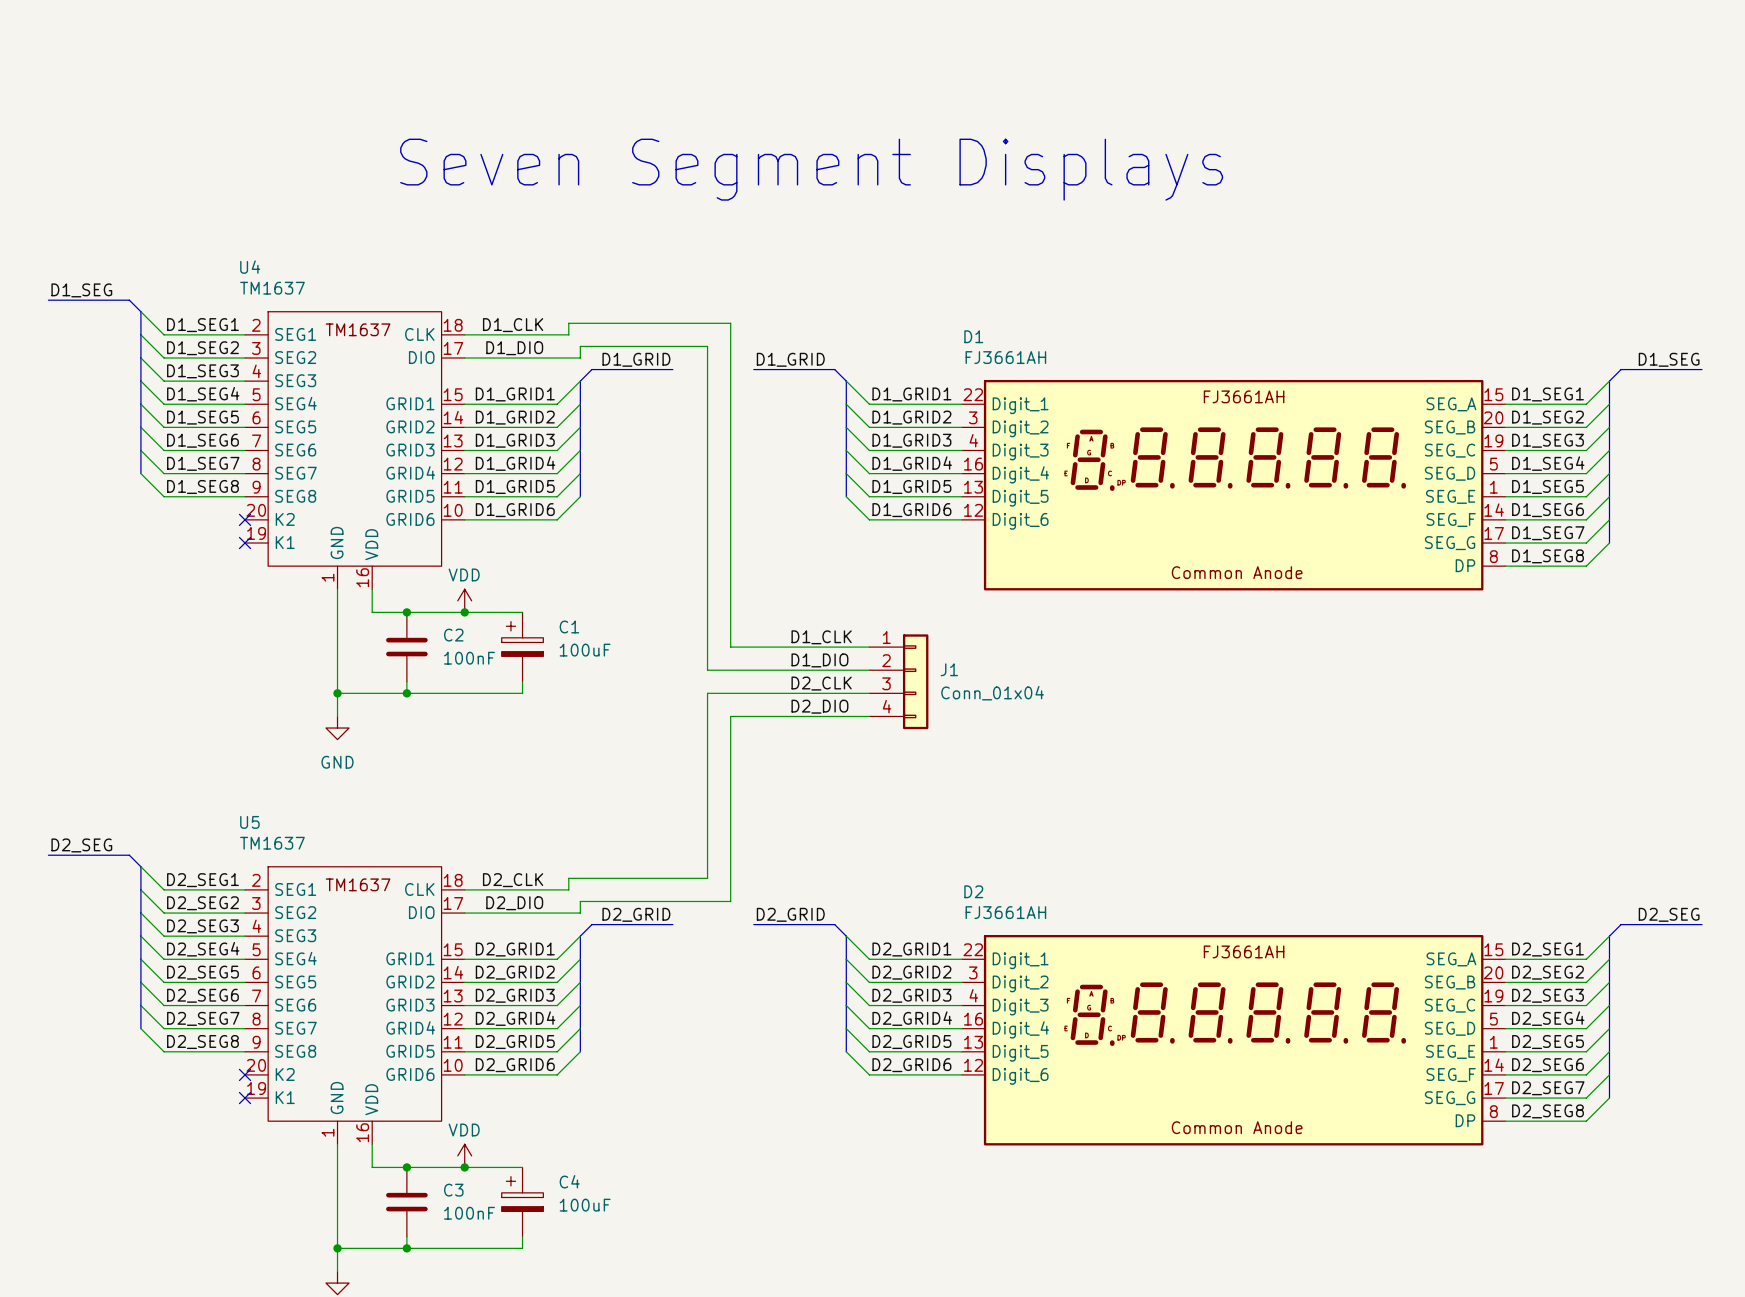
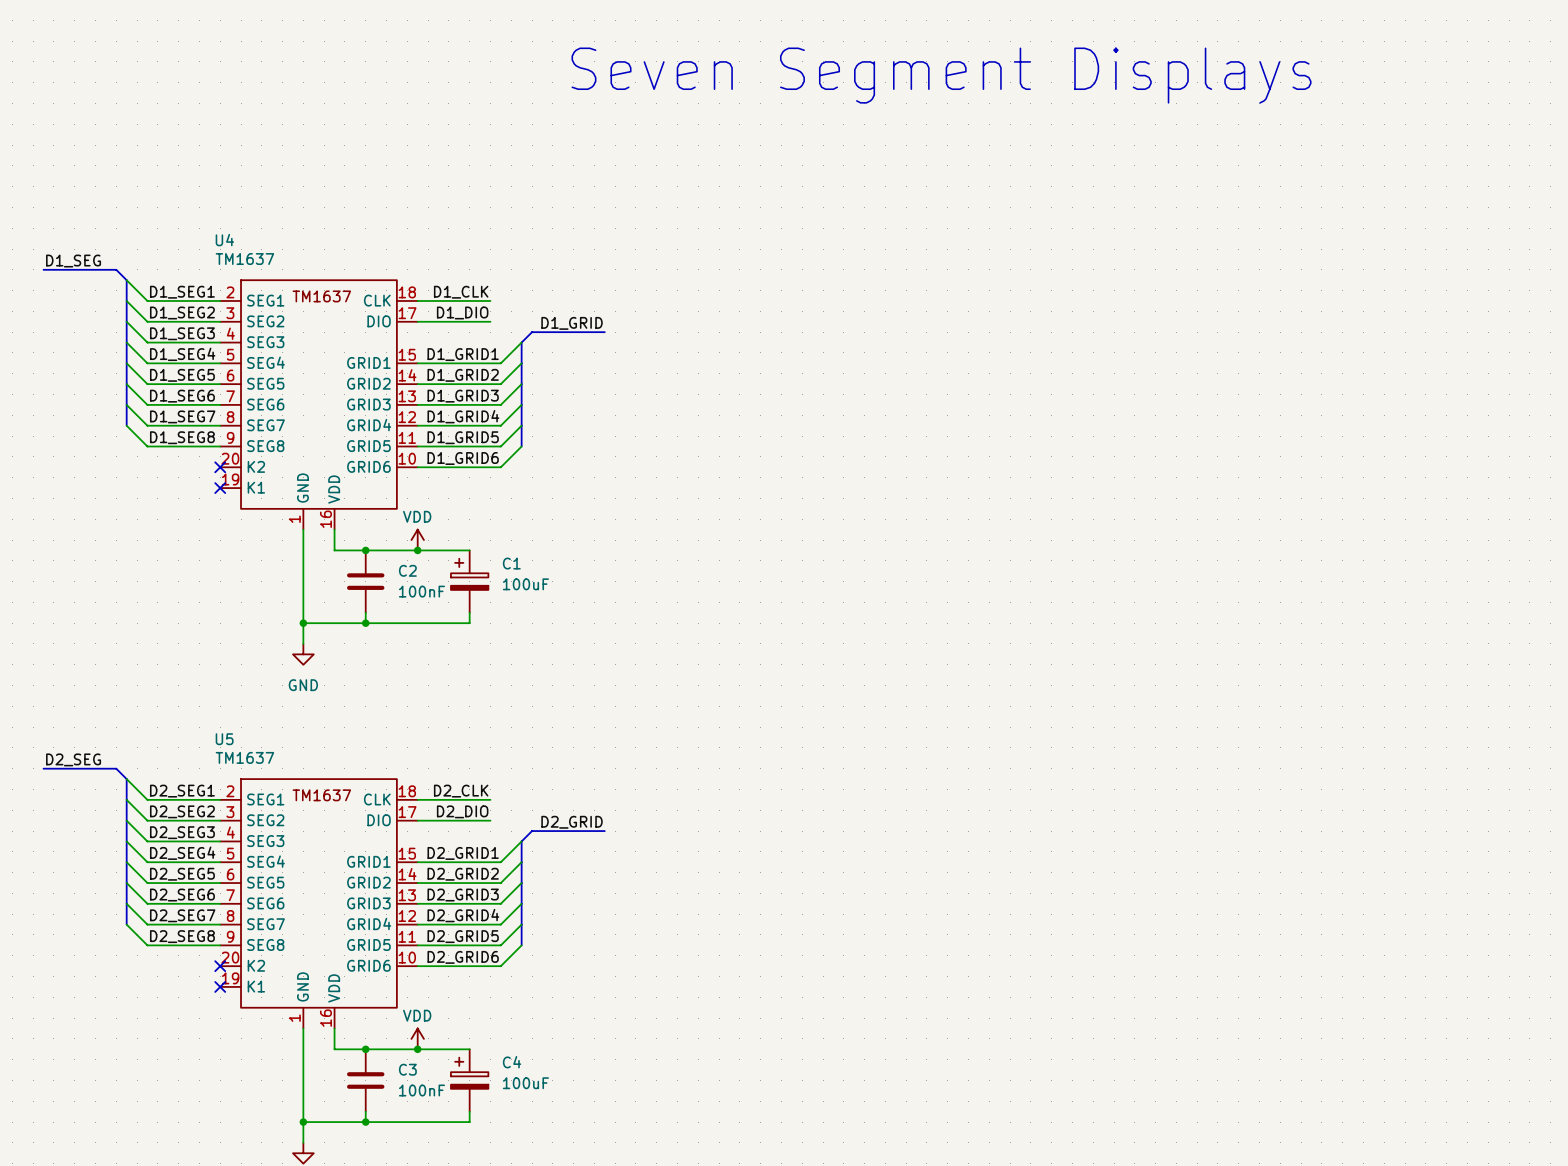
text: none -> Seven Segment Displays (941, 75)
text: Seven Segment Displays (811, 169) -> none
wire: (545, 334) (568, 334) (568, 323) (730, 323) (730, 647) (869, 647) -> none
wire: (545, 357) (580, 357) (580, 346) (707, 346) (707, 670) (869, 670) -> none
label: D1_GRID (790, 359) -> none
label: D1_SEG (1669, 359) -> none
bus: (753, 369) (834, 369) (846, 381) (846, 496) -> none
bus: (1701, 369) (1621, 369) (1609, 381) (1609, 543) -> none
wire: (846, 381) (869, 404) (961, 404) -> none
wire: (1609, 381) (1586, 404) (1505, 404) -> none
label: D1_GRID1 (911, 394) -> none
label: D1_SEG1 (1548, 394) -> none
wire: (846, 404) (869, 427) (961, 427) -> none
wire: (1609, 404) (1586, 427) (1505, 427) -> none
label: D1_GRID2 (911, 417) -> none
label: D1_SEG2 (1548, 417) -> none
wire: (846, 427) (869, 450) (961, 450) -> none
wire: (1609, 427) (1586, 450) (1505, 450) -> none
label: D1_GRID3 (911, 440) -> none
label: D1_SEG3 (1548, 440) -> none
wire: (846, 450) (869, 473) (961, 473) -> none
wire: (1609, 450) (1586, 473) (1505, 473) -> none
label: D1_GRID4 (912, 463) -> none
label: D1_SEG4 (1548, 463) -> none
wire: (846, 473) (869, 496) (961, 496) -> none
wire: (1609, 473) (1586, 496) (1505, 496) -> none
D1: FJ3661AH (1233, 485) -> none
label: D1_GRID5 (911, 486) -> none
label: D1_SEG5 (1548, 486) -> none
wire: (846, 496) (869, 519) (961, 519) -> none
wire: (1609, 496) (1586, 519) (1505, 519) -> none
label: D1_GRID6 (911, 510) -> none
label: D1_SEG6 (1548, 510) -> none
wire: (1609, 519) (1586, 543) (1505, 543) -> none
label: D1_SEG7 (1548, 533) -> none
wire: (1609, 543) (1586, 566) (1505, 566) -> none
label: D1_SEG8 (1548, 556) -> none
label: D1_CLK (821, 637) -> none
label: D1_DIO (819, 660) -> none
J1: Conn_01x04 (898, 681) -> none
label: D2_CLK (821, 683) -> none
wire: (869, 693) (707, 693) (707, 878) (568, 878) (568, 889) (545, 889) -> none
label: D2_DIO (819, 706) -> none
wire: (869, 716) (730, 716) (730, 901) (580, 901) (580, 913) (545, 913) -> none
label: D2_GRID (790, 914) -> none
label: D2_SEG (1669, 914) -> none
bus: (753, 924) (834, 924) (846, 936) (846, 1051) -> none
bus: (1701, 924) (1621, 924) (1609, 936) (1609, 1098) -> none
wire: (846, 936) (869, 959) (961, 959) -> none
wire: (1609, 936) (1586, 959) (1505, 959) -> none
label: D2_GRID1 (911, 949) -> none
label: D2_SEG1 (1548, 949) -> none
wire: (846, 959) (869, 982) (961, 982) -> none
wire: (1609, 959) (1586, 982) (1505, 982) -> none
label: D2_GRID2 (911, 972) -> none
label: D2_SEG2 (1548, 972) -> none
wire: (846, 982) (869, 1005) (961, 1005) -> none
wire: (1609, 982) (1586, 1005) (1505, 1005) -> none
label: D2_GRID3 (911, 995) -> none
label: D2_SEG3 (1548, 995) -> none
wire: (846, 1005) (869, 1028) (961, 1028) -> none
wire: (1609, 1005) (1586, 1028) (1505, 1028) -> none
label: D2_GRID4 (912, 1018) -> none
label: D2_SEG4 (1548, 1018) -> none
wire: (846, 1028) (869, 1051) (961, 1051) -> none
wire: (1609, 1028) (1586, 1051) (1505, 1051) -> none
D2: FJ3661AH (1233, 1040) -> none
label: D2_GRID5 (911, 1042) -> none
label: D2_SEG5 (1548, 1042) -> none
wire: (846, 1051) (869, 1074) (961, 1074) -> none
wire: (1609, 1051) (1586, 1074) (1505, 1074) -> none
label: D2_GRID6 (911, 1065) -> none
label: D2_SEG6 (1548, 1065) -> none
wire: (1609, 1074) (1586, 1098) (1505, 1098) -> none
label: D2_SEG7 (1548, 1088) -> none
wire: (1609, 1098) (1586, 1121) (1505, 1121) -> none
label: D2_SEG8 (1548, 1111) -> none

